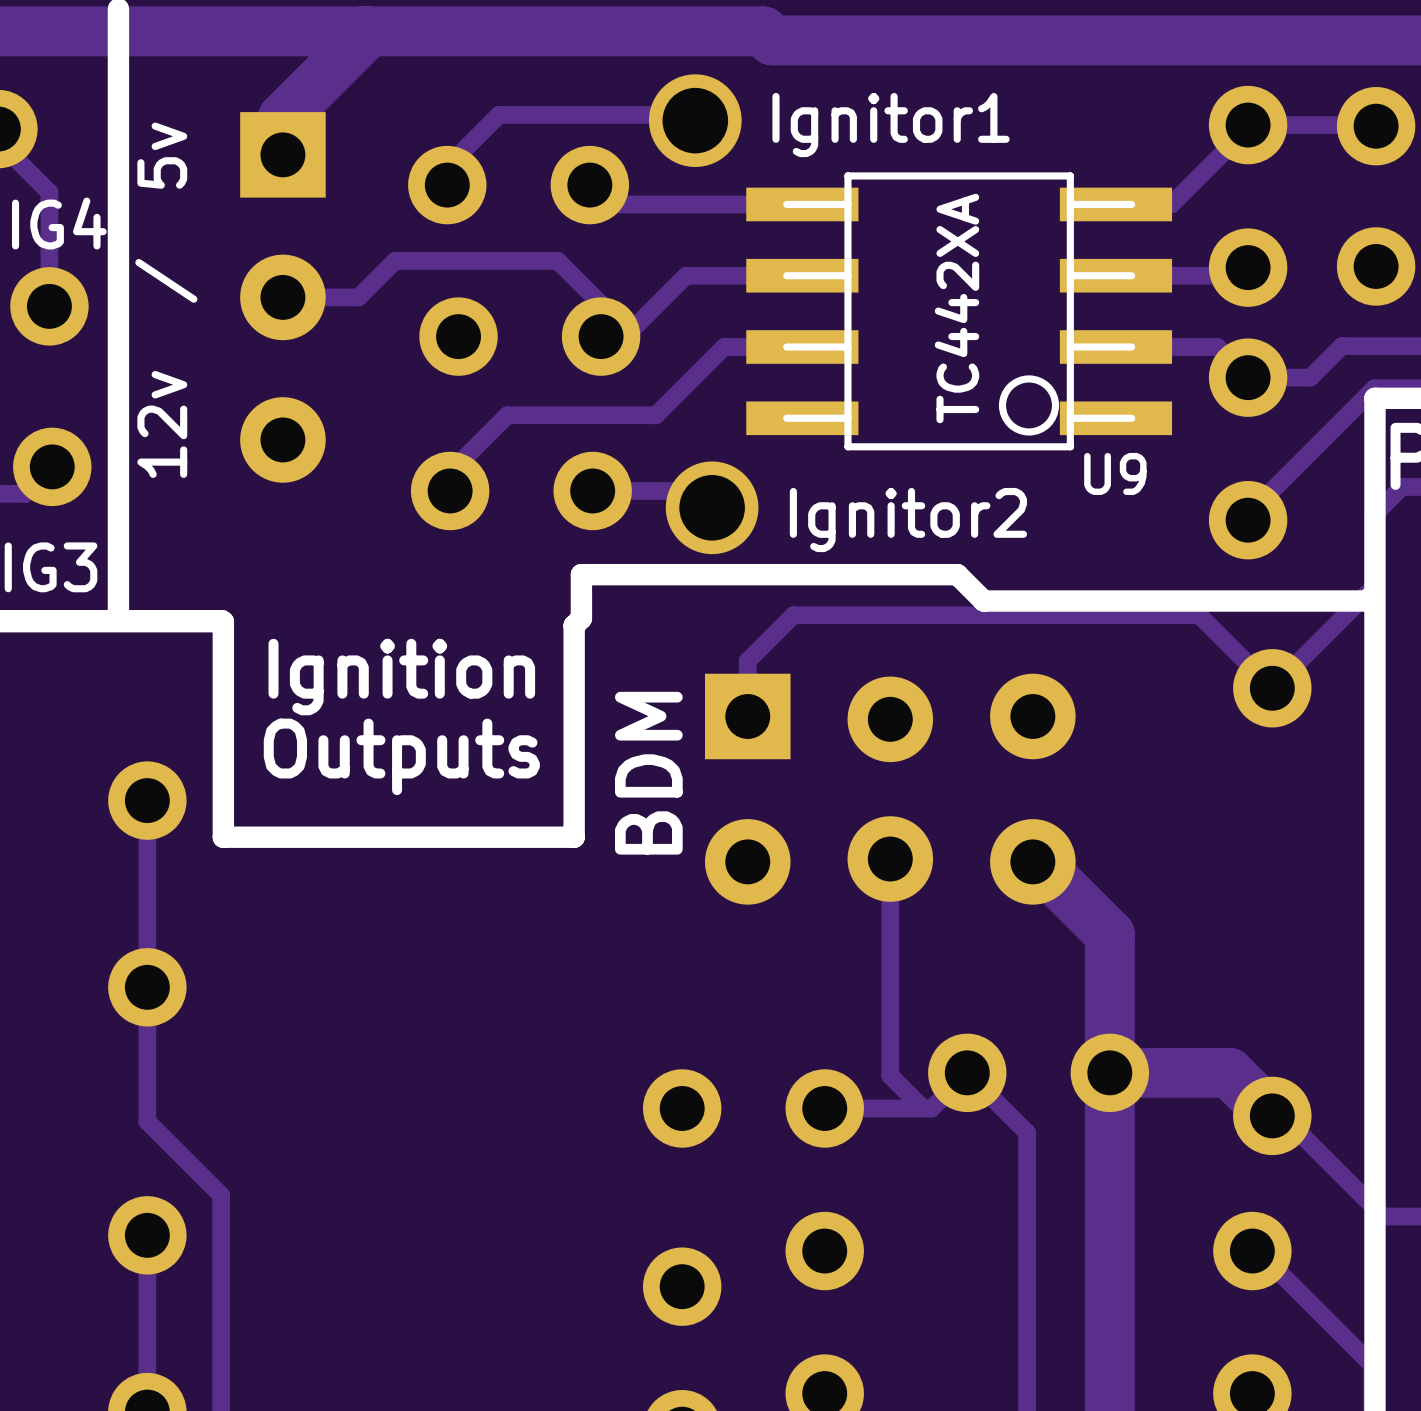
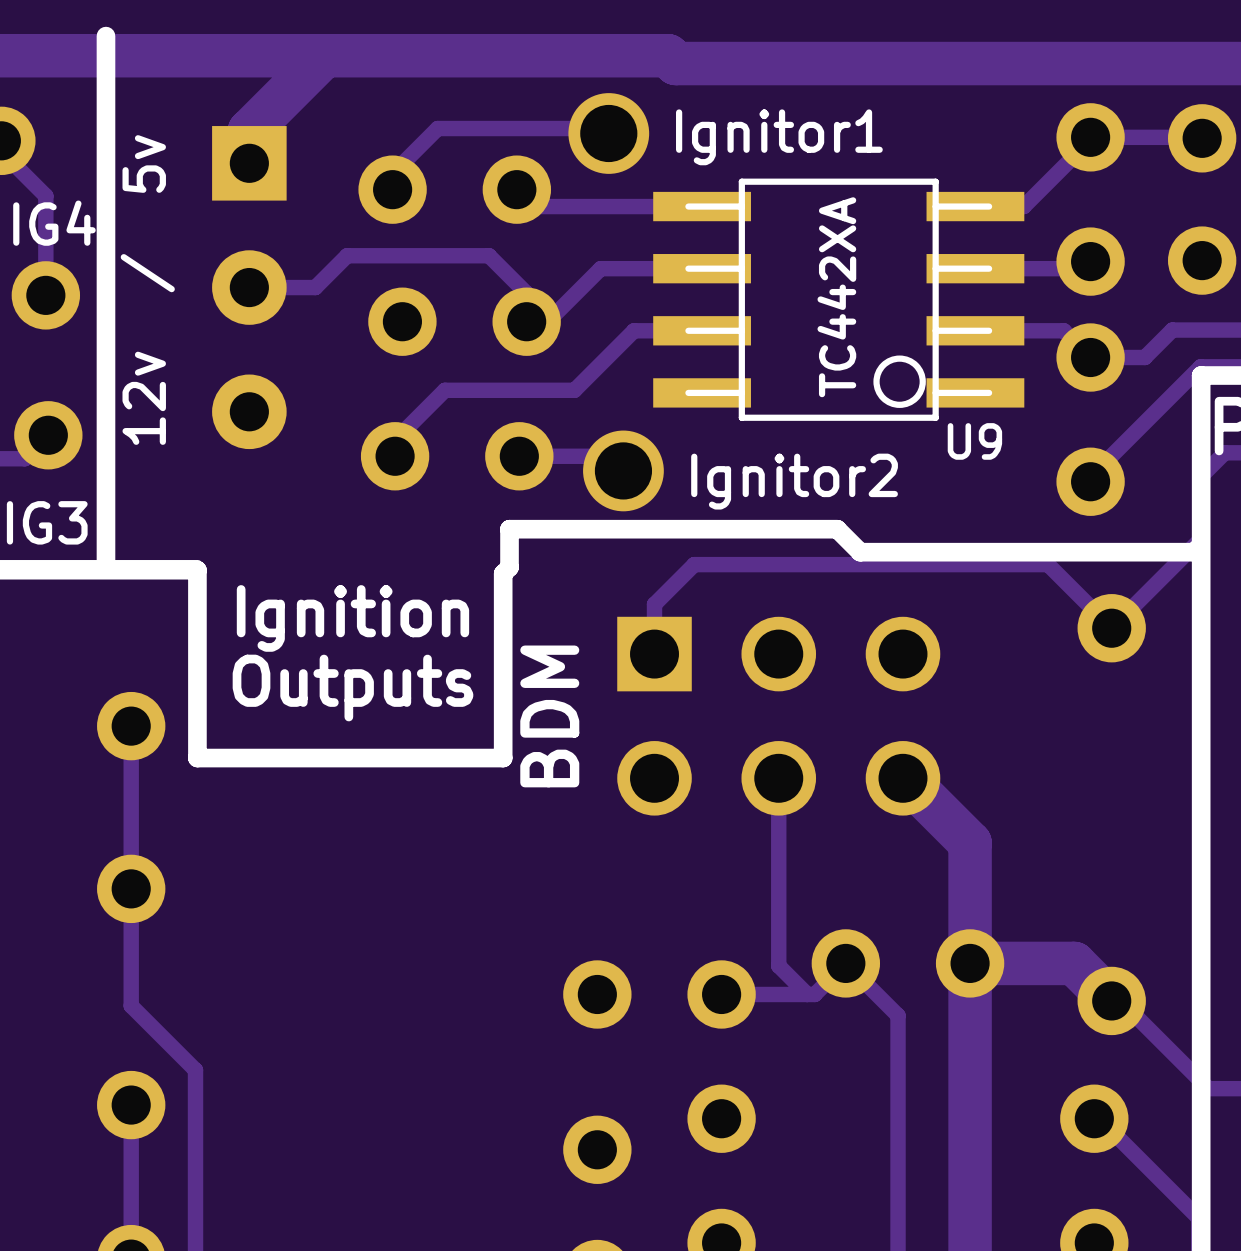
part footprint: [705, 673, 1076, 905] -> [617, 616, 941, 816]
text position: BDM (648, 773) -> BDM (549, 716)

